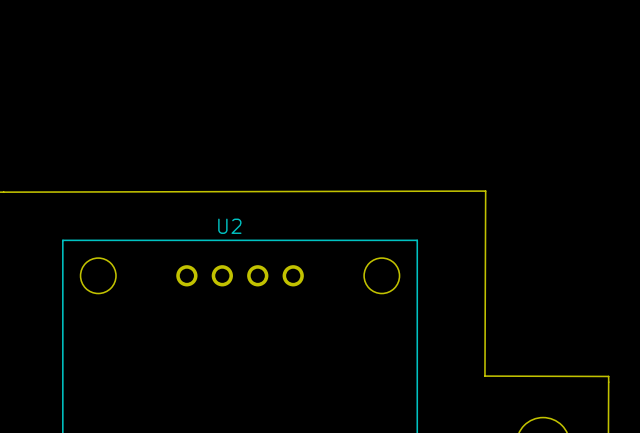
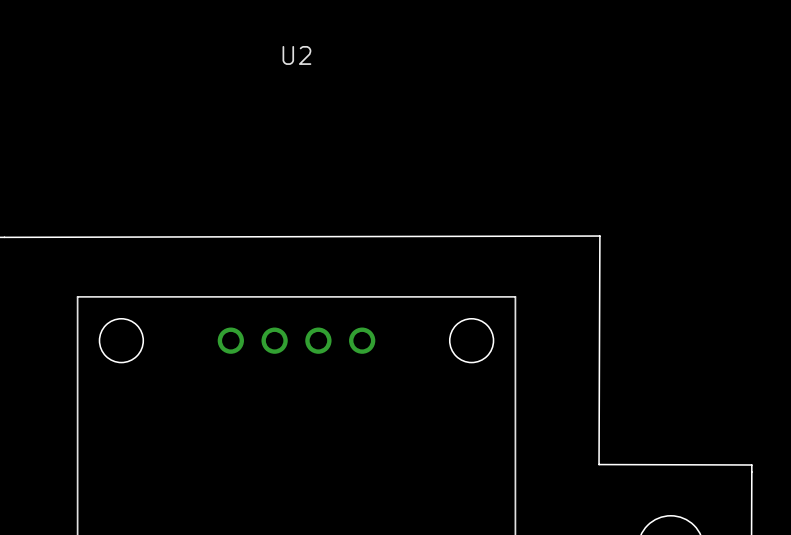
U2 name position: U2 (229, 226) -> U2 (296, 55)

